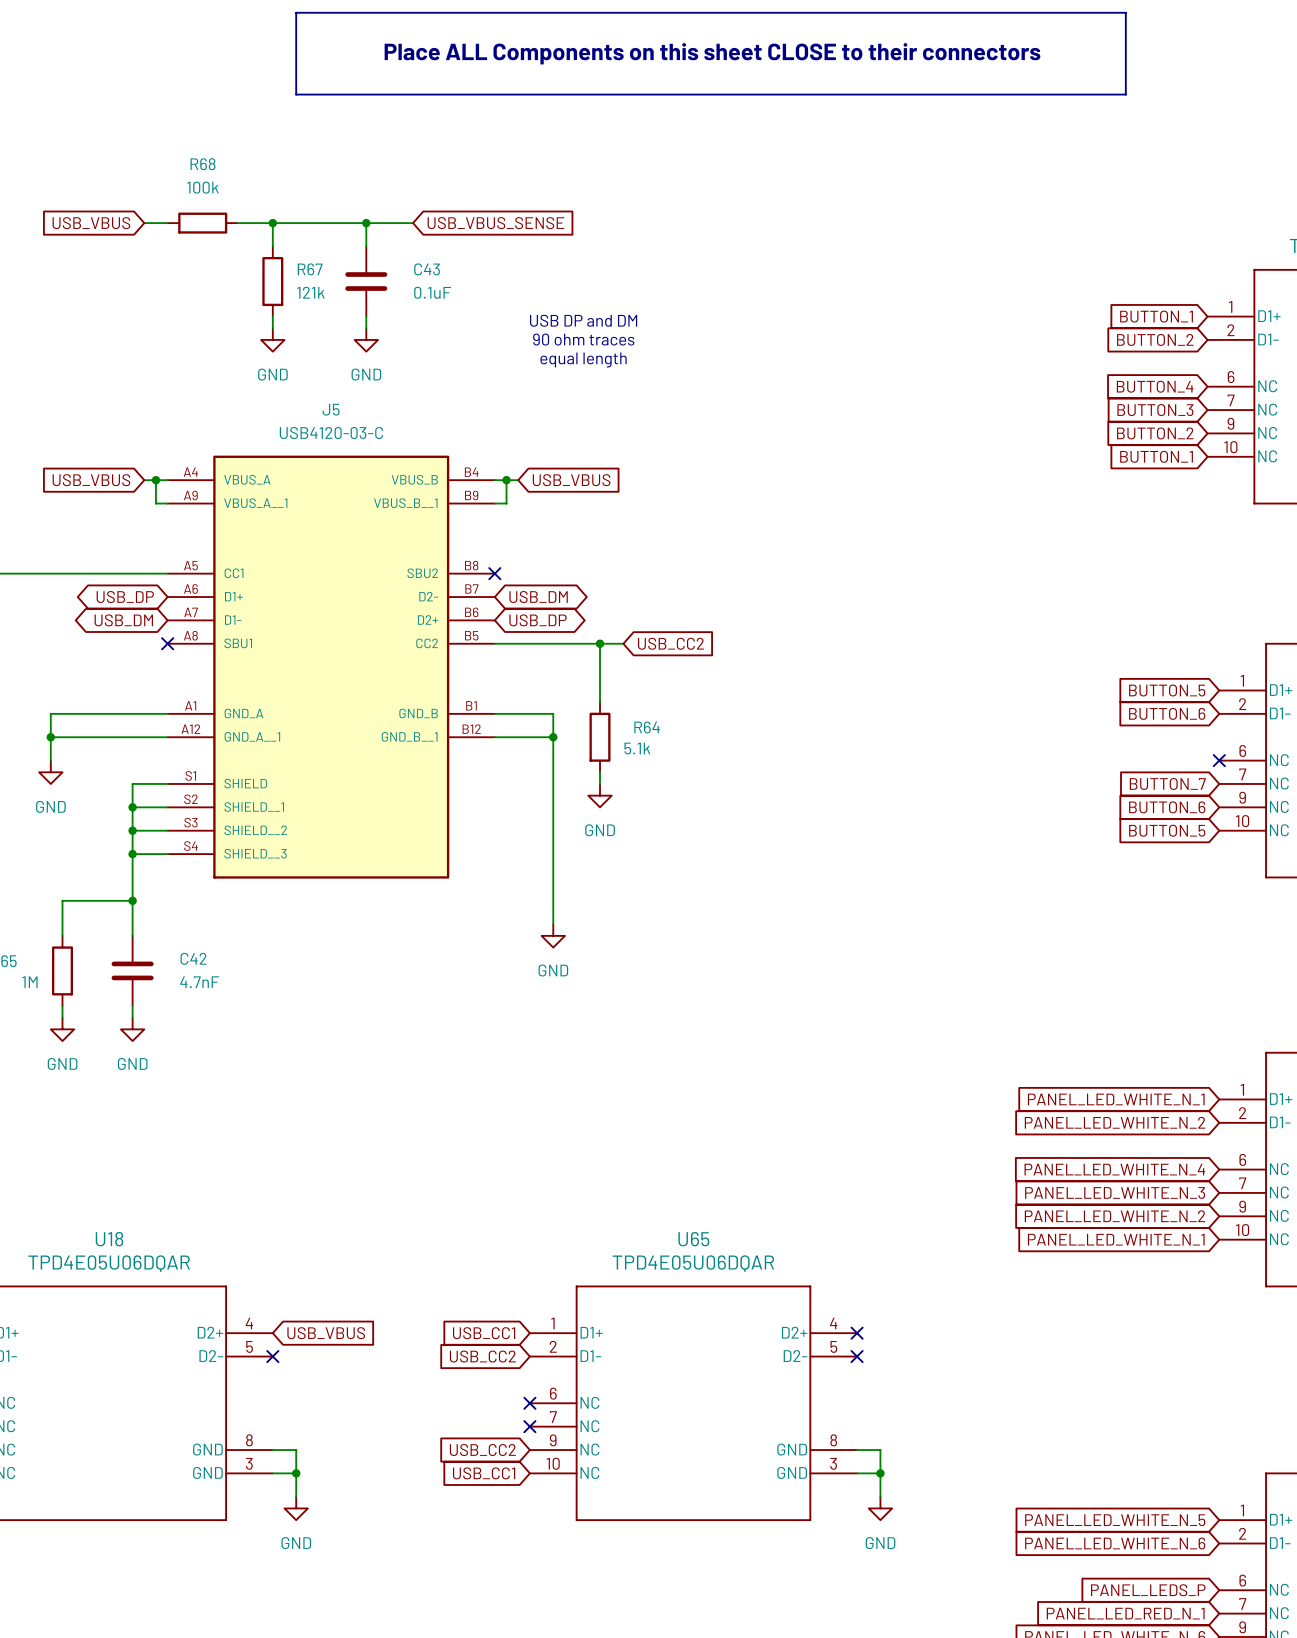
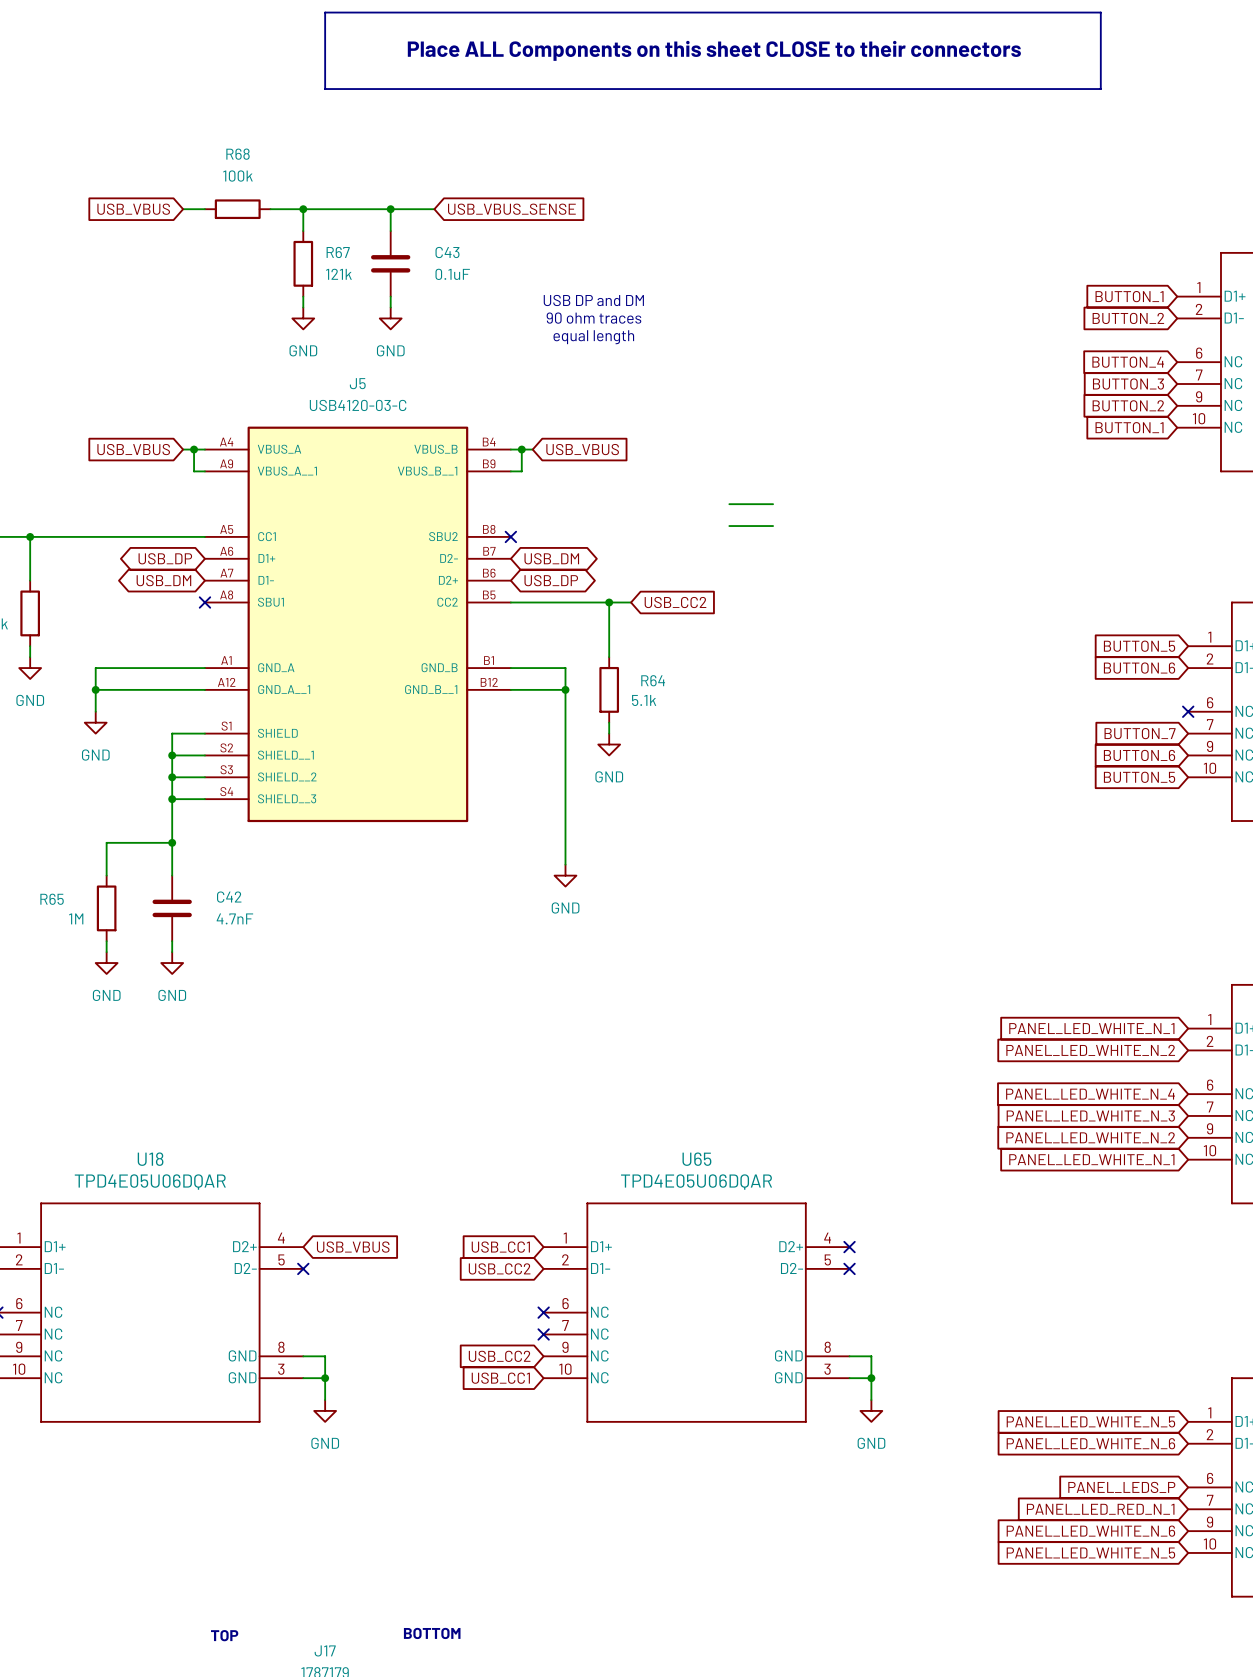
wire: none -> (729, 504) (773, 504)
wire: none -> (729, 526) (773, 526)

